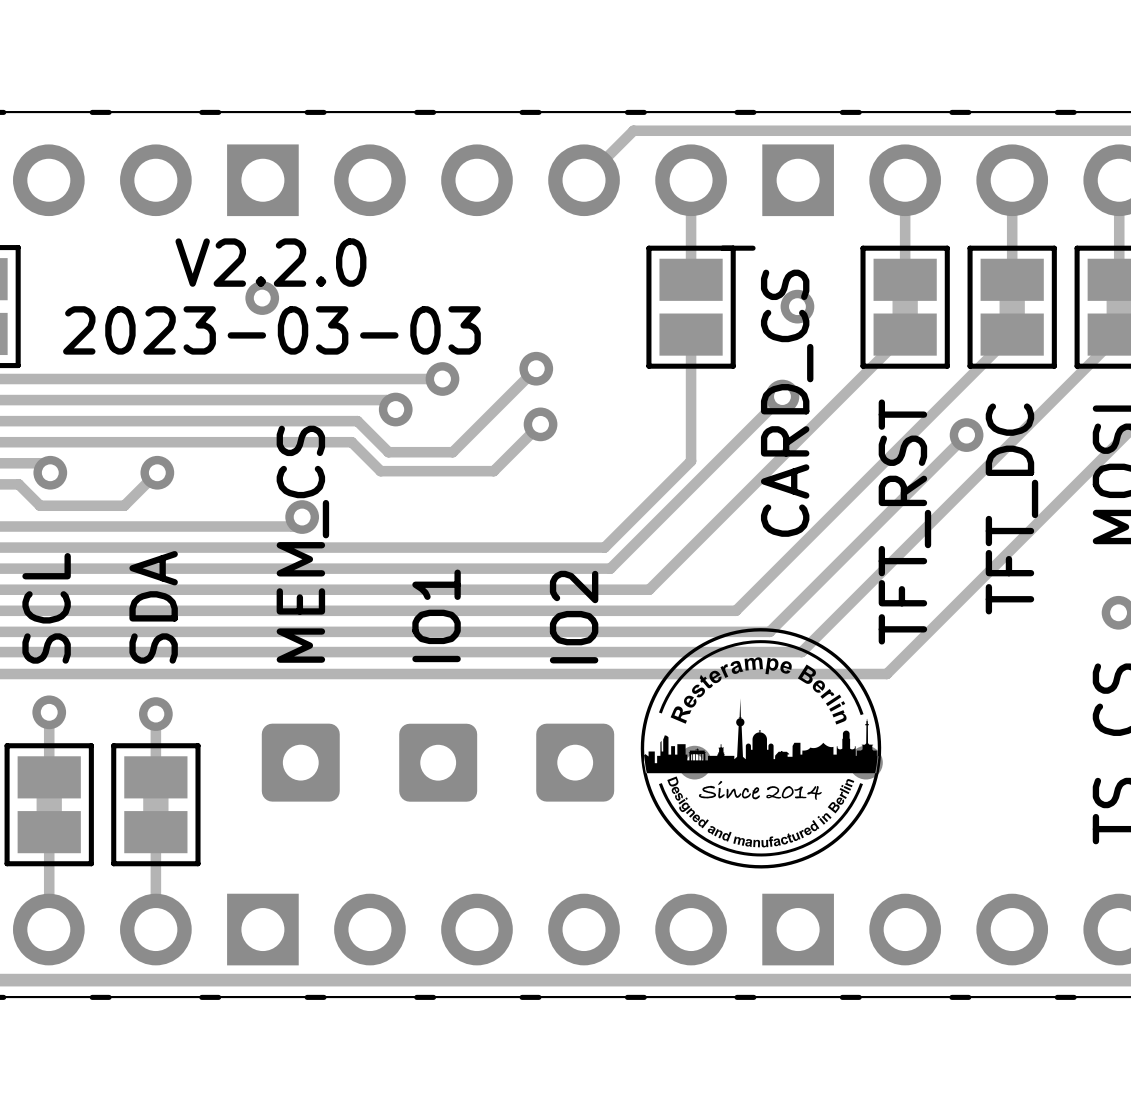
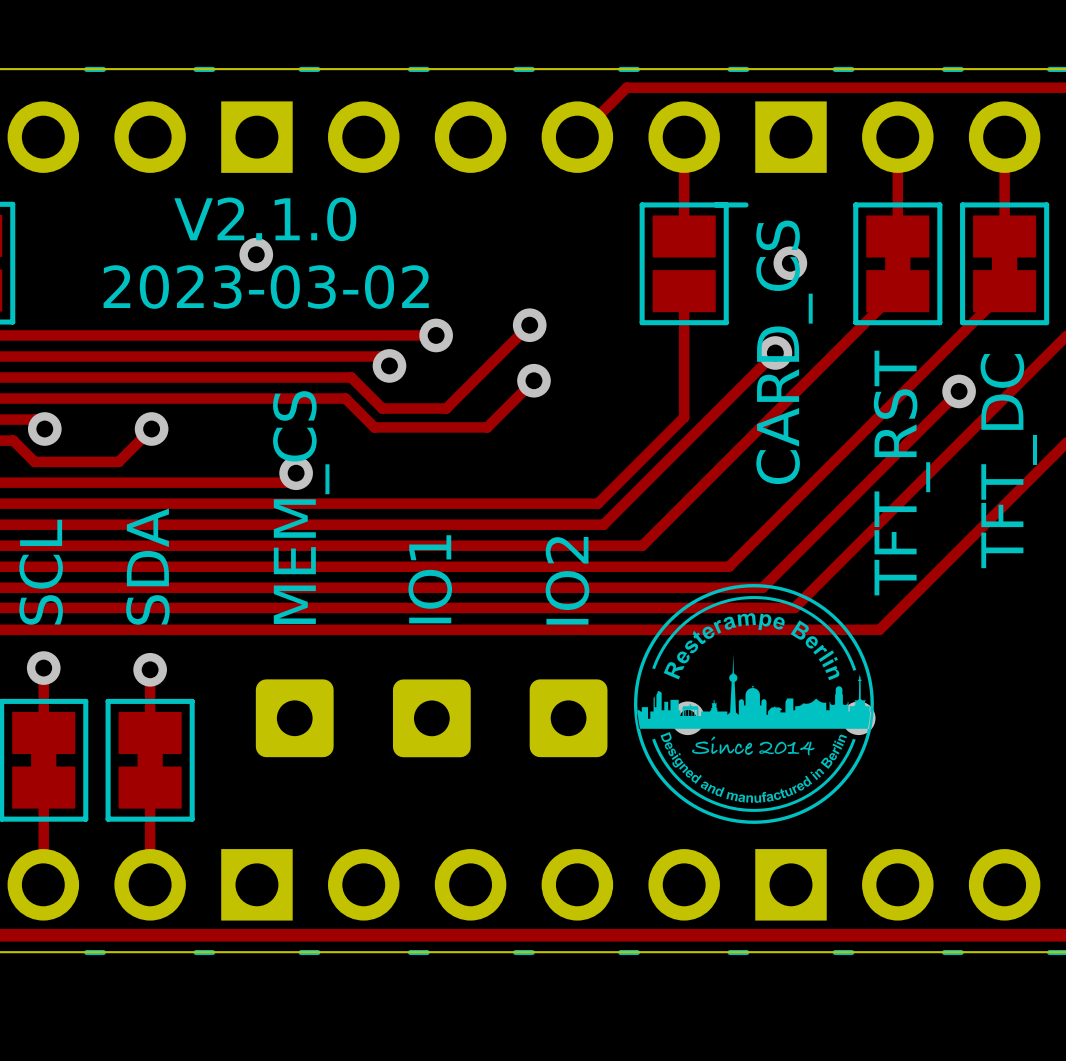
text: V2.2.0 (270, 262) -> V2.1.0 (265, 219)
text: 2023-03-03 (271, 330) -> 2023-03-02 (266, 287)

